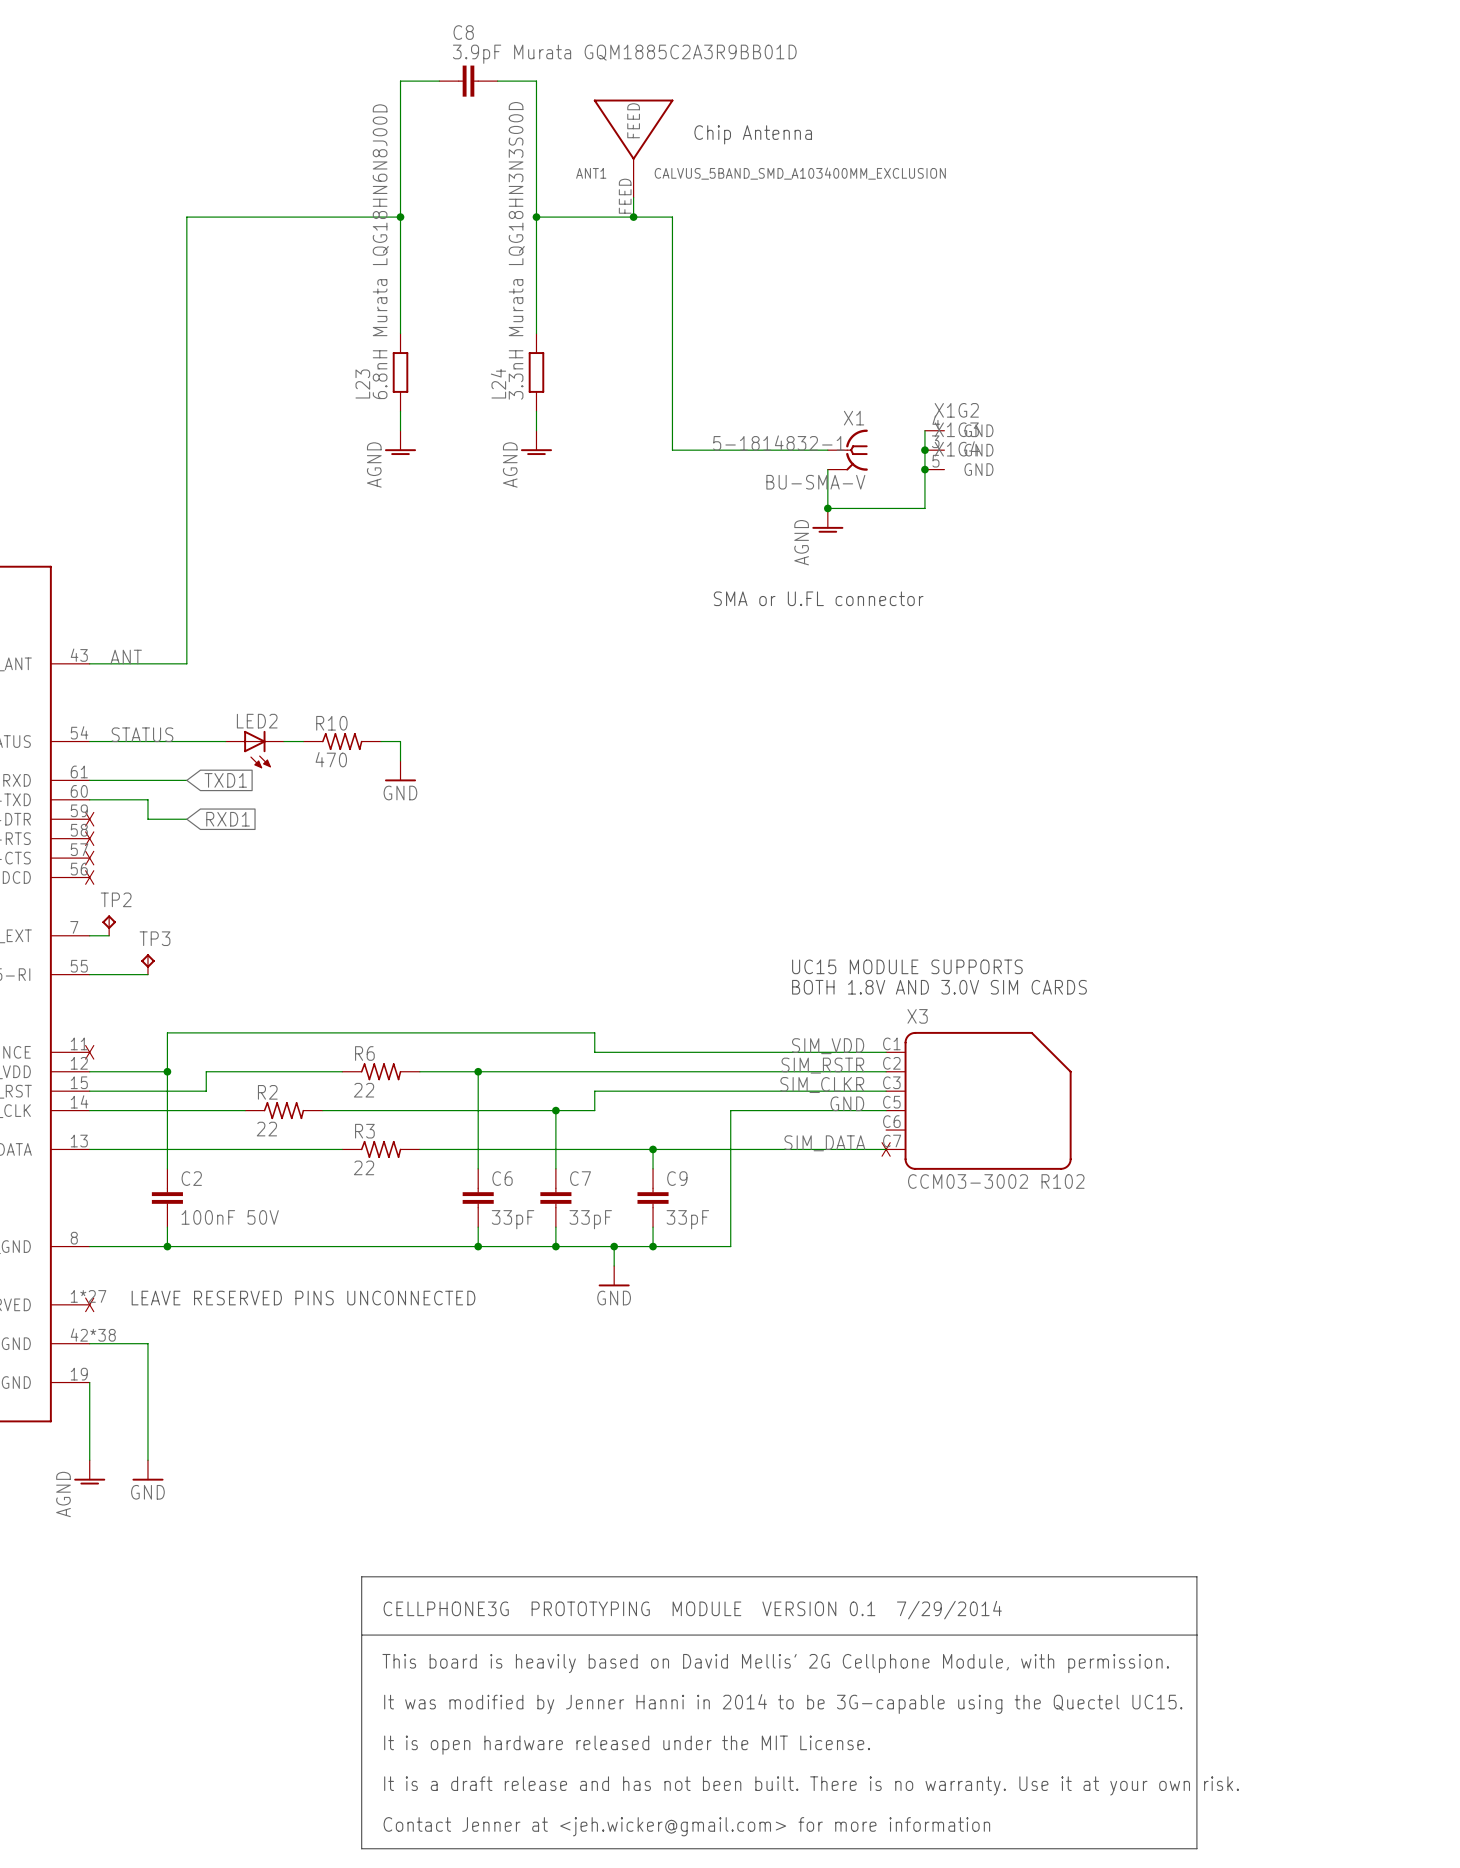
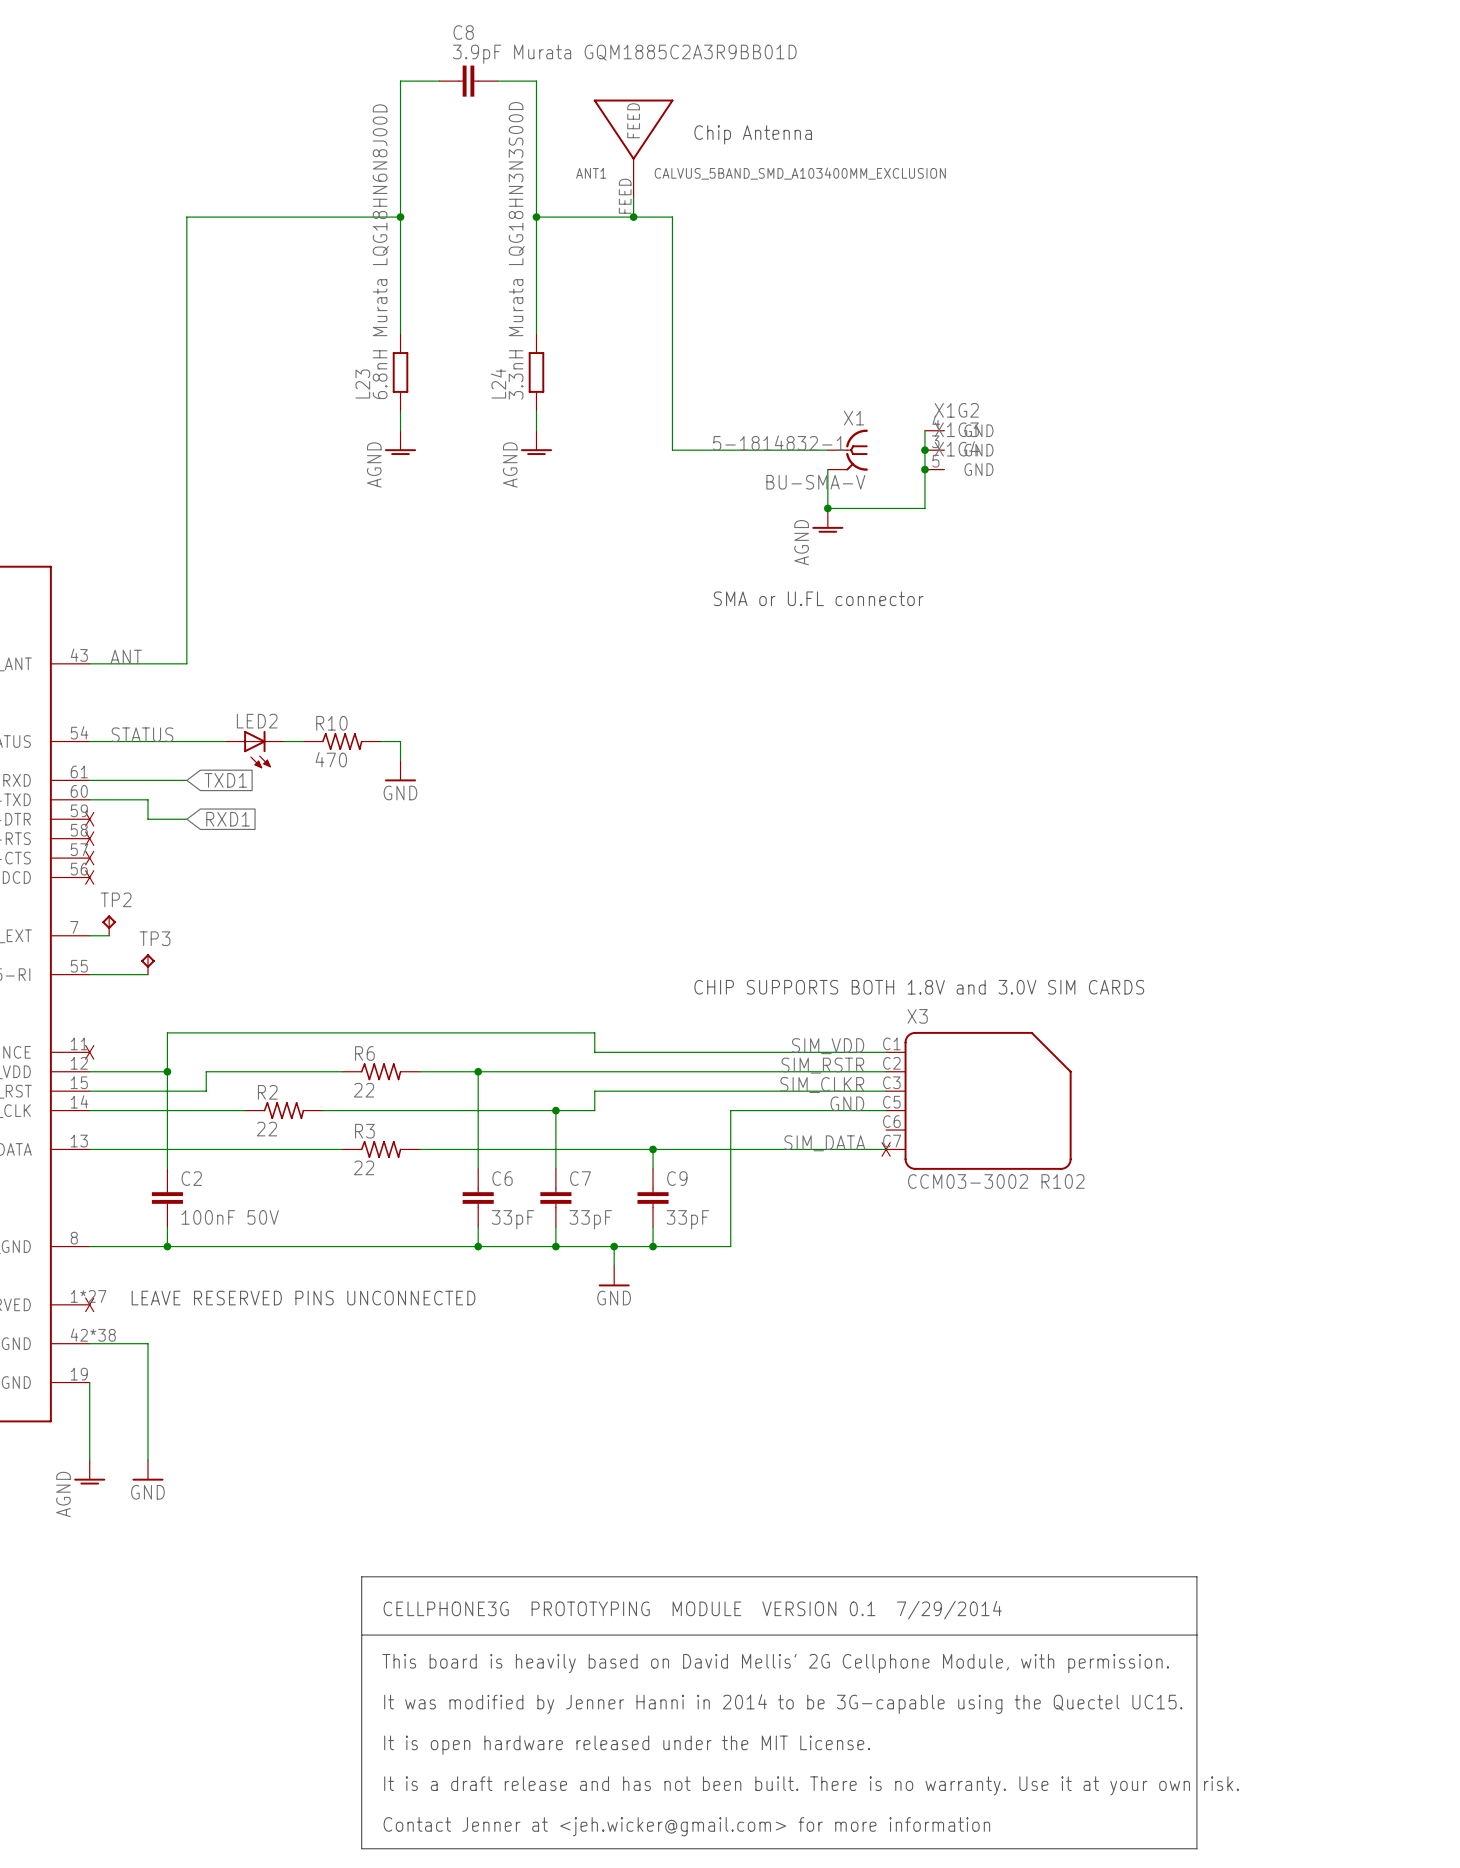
text: UC15 MODULE SUPPORTS (907, 966) -> none
text: BOTH 1.8V AND 3.0V SIM CARDS (939, 987) -> CHIP SUPPORTS BOTH 1.8V and 3.0V SIM CARDS (919, 987)

